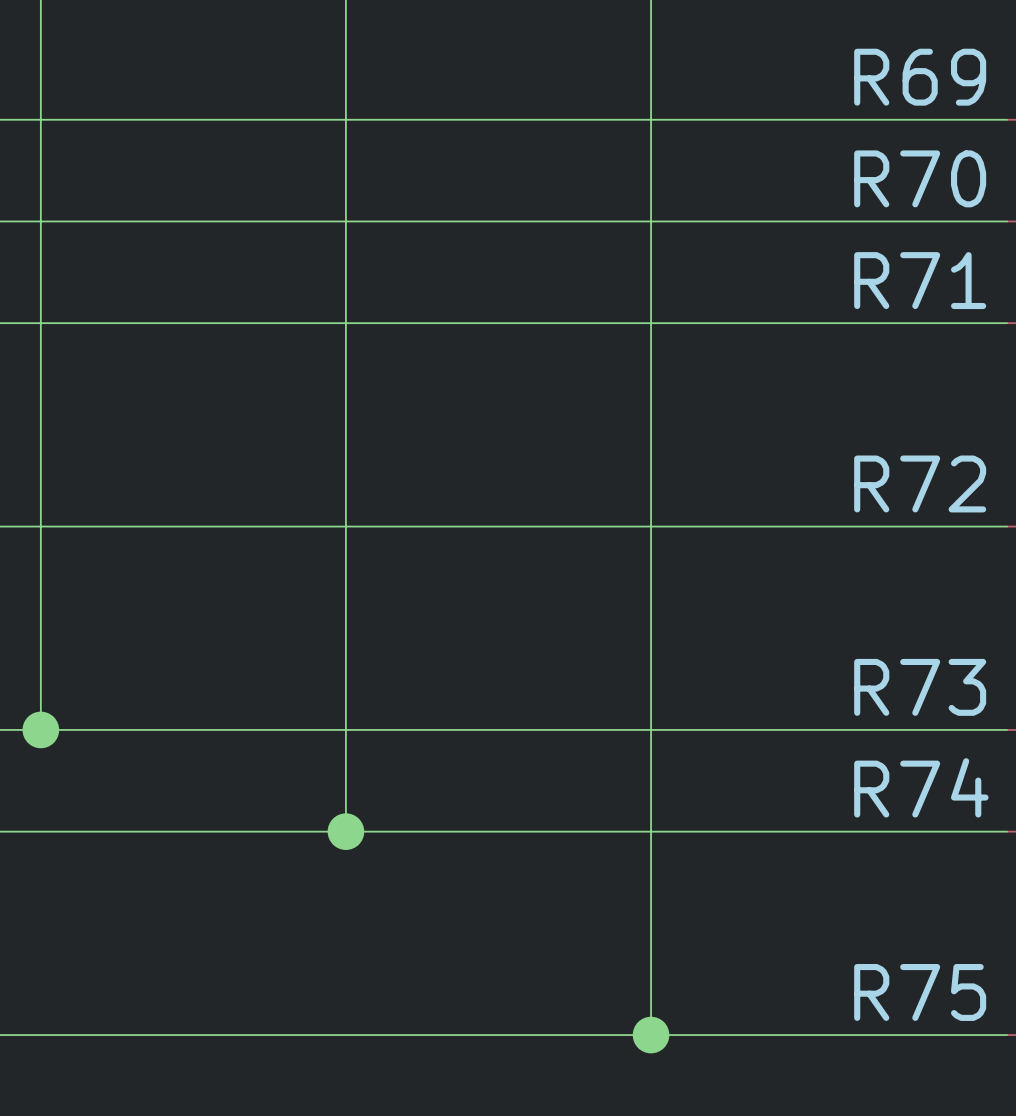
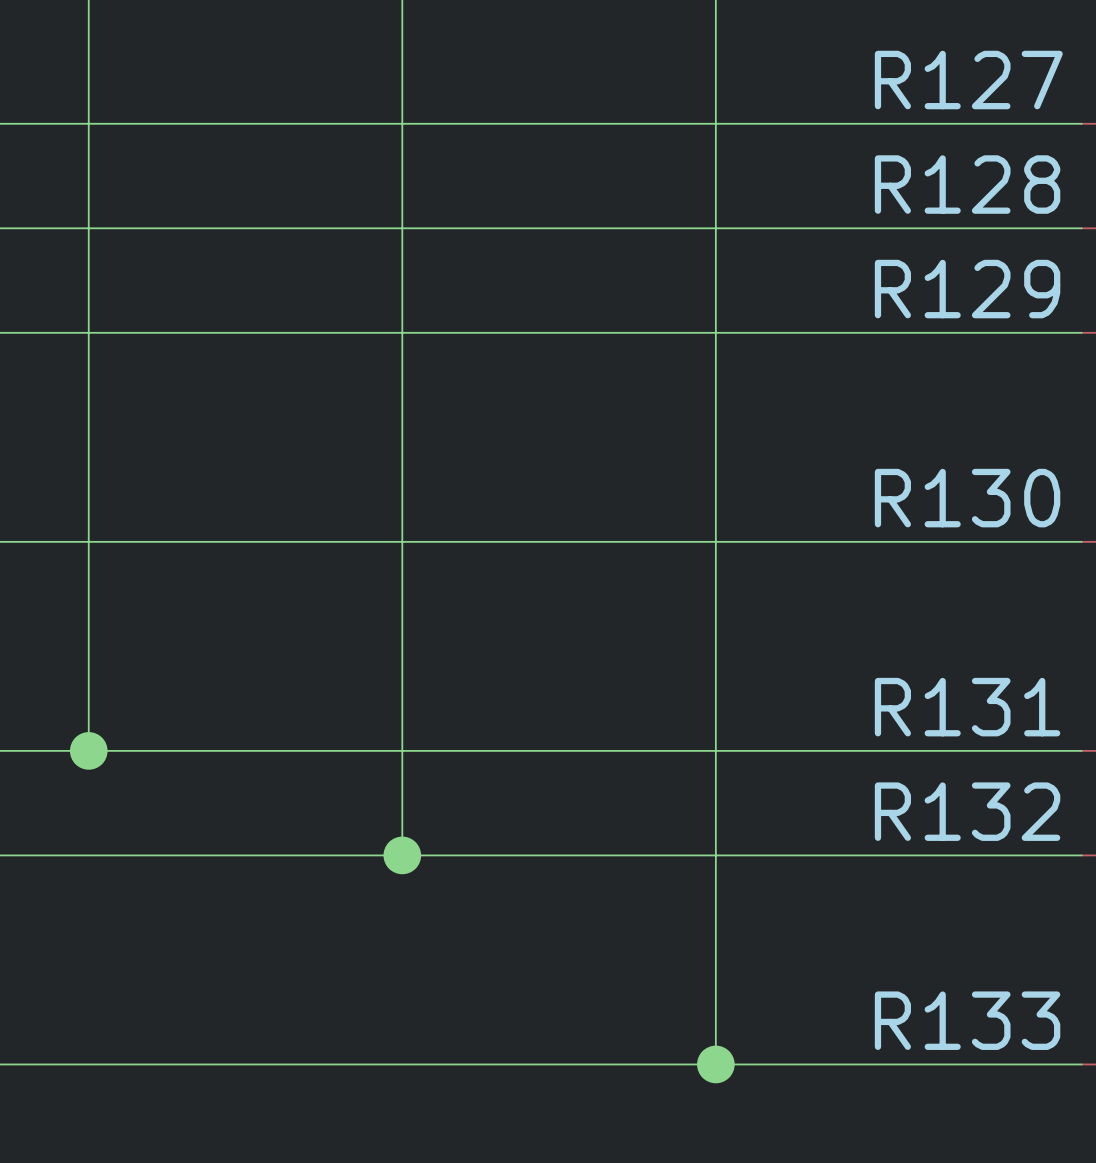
R69 name: R69 (920, 77) -> R127 (968, 80)
R70 name: R70 (920, 178) -> R128 (967, 184)
R71 name: R71 (920, 280) -> R129 (967, 289)
R72 name: R72 (920, 483) -> R130 (967, 498)
R73 name: R73 (920, 687) -> R131 (967, 707)
R74 name: R74 (921, 787) -> R132 (967, 811)
R75 name: R75 (920, 992) -> R133 (967, 1020)

